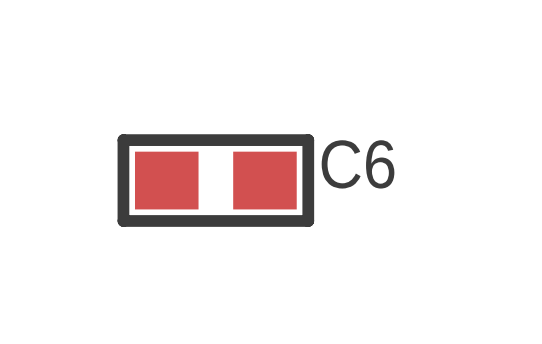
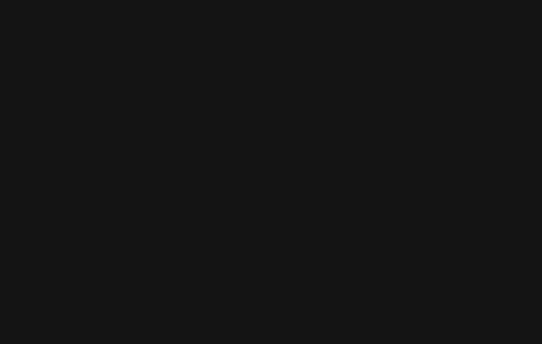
C6: (215, 180) -> none

